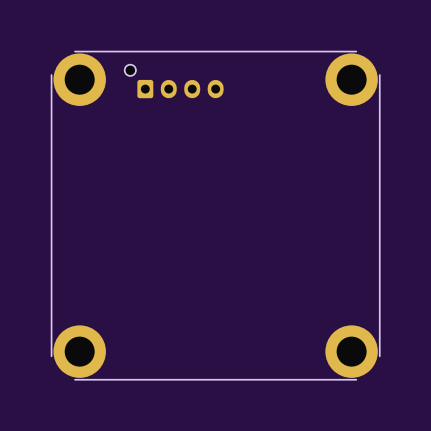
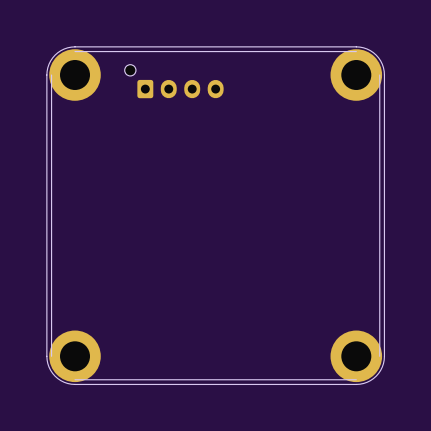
board edge: none -> (356, 46) (75, 46) (64, 49) (55, 55) (49, 64) (46, 75) (46, 356) (49, 367) (55, 376) (64, 382) (75, 384) (356, 384) (367, 382) (376, 376) (382, 367) (384, 356) (384, 75) (382, 64) (376, 55) (367, 49) (356, 46)
part footprint: [53, 53, 106, 106] -> [49, 49, 101, 101]
part footprint: [325, 53, 378, 106] -> [330, 49, 383, 101]
part footprint: [53, 325, 106, 378] -> [49, 330, 101, 383]
part footprint: [325, 325, 378, 378] -> [330, 330, 383, 383]

